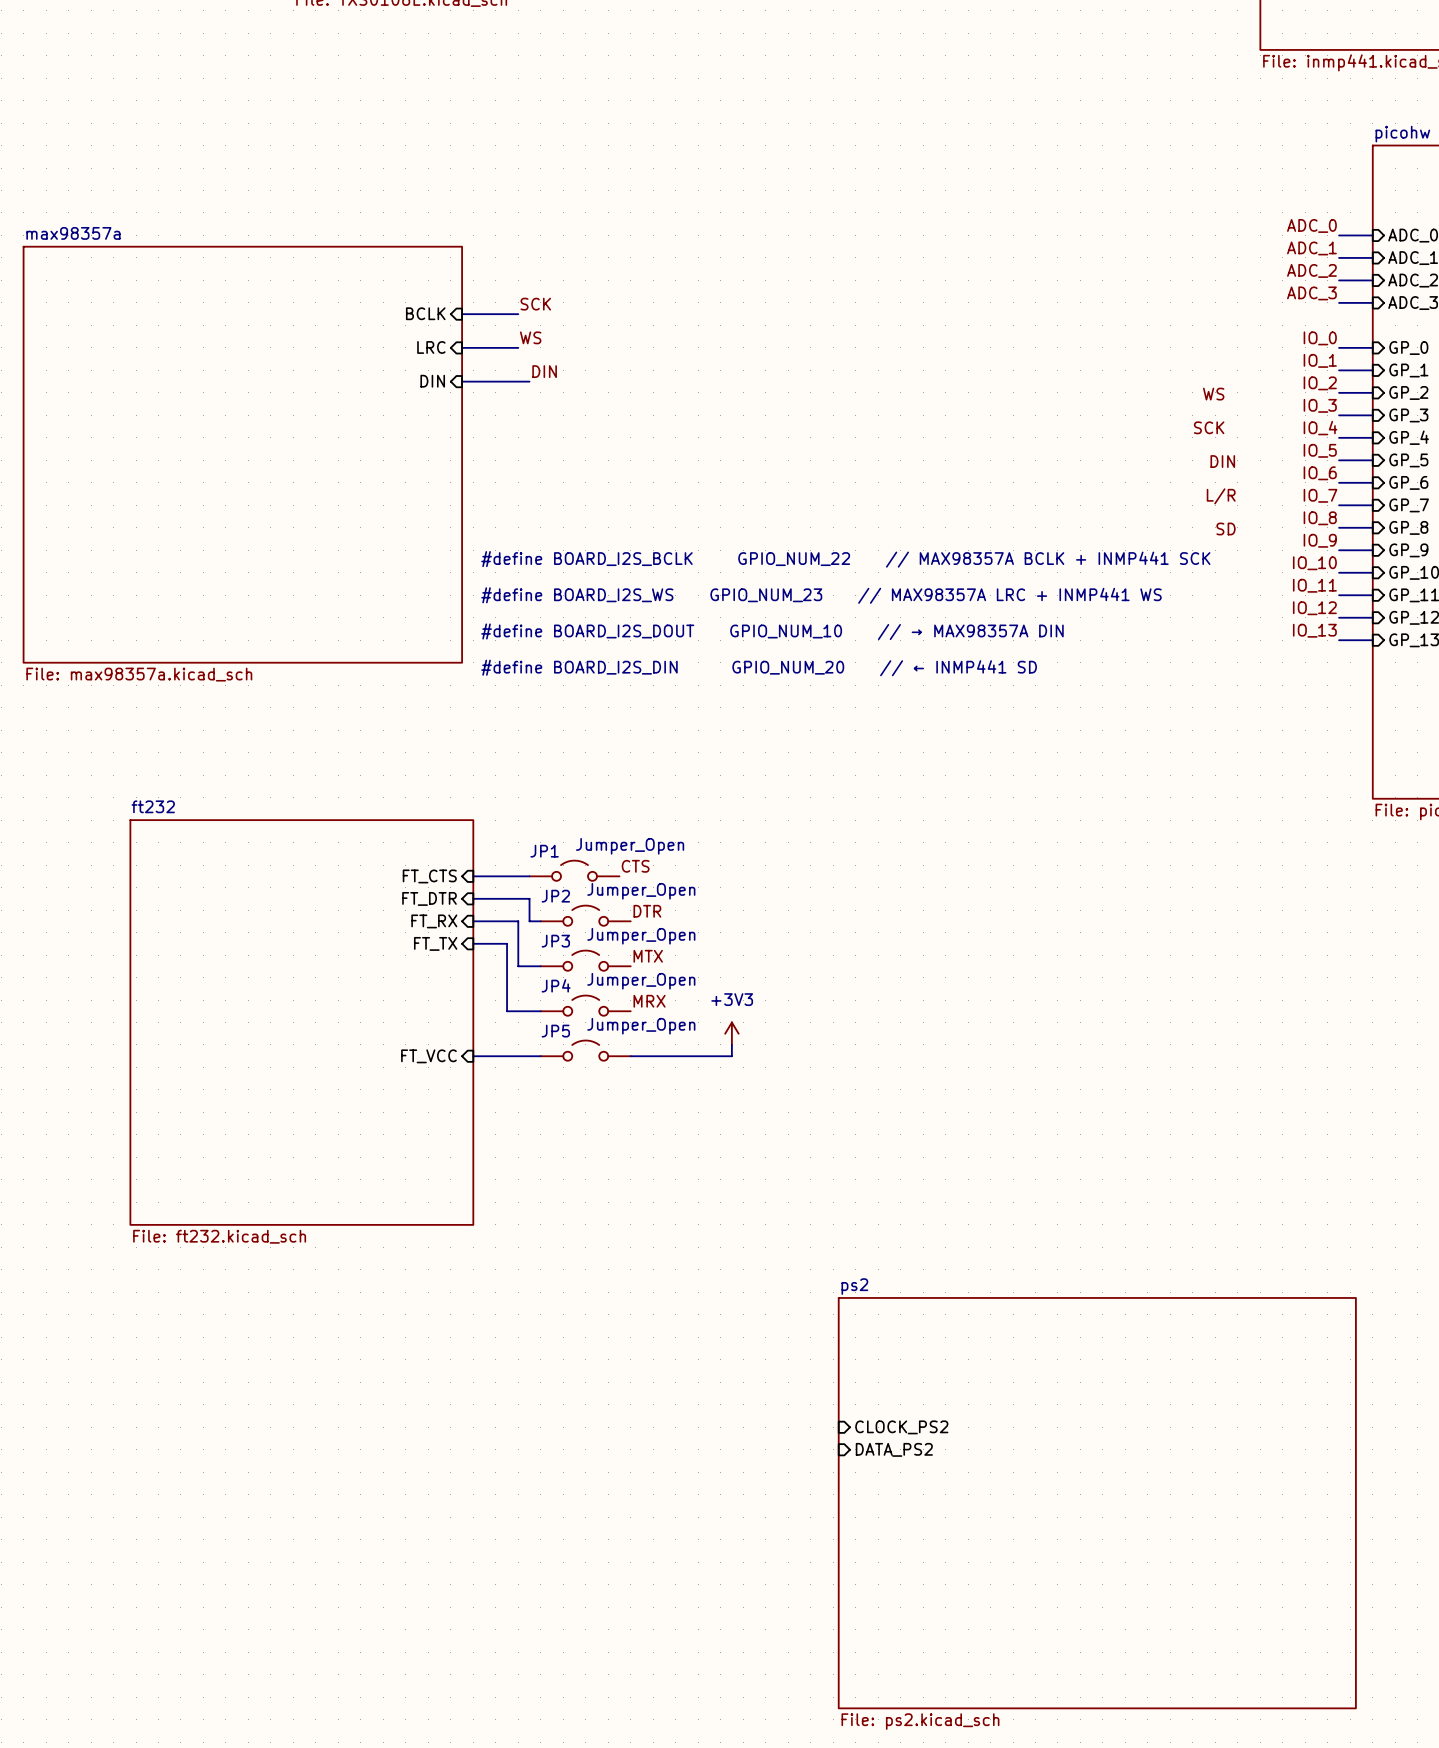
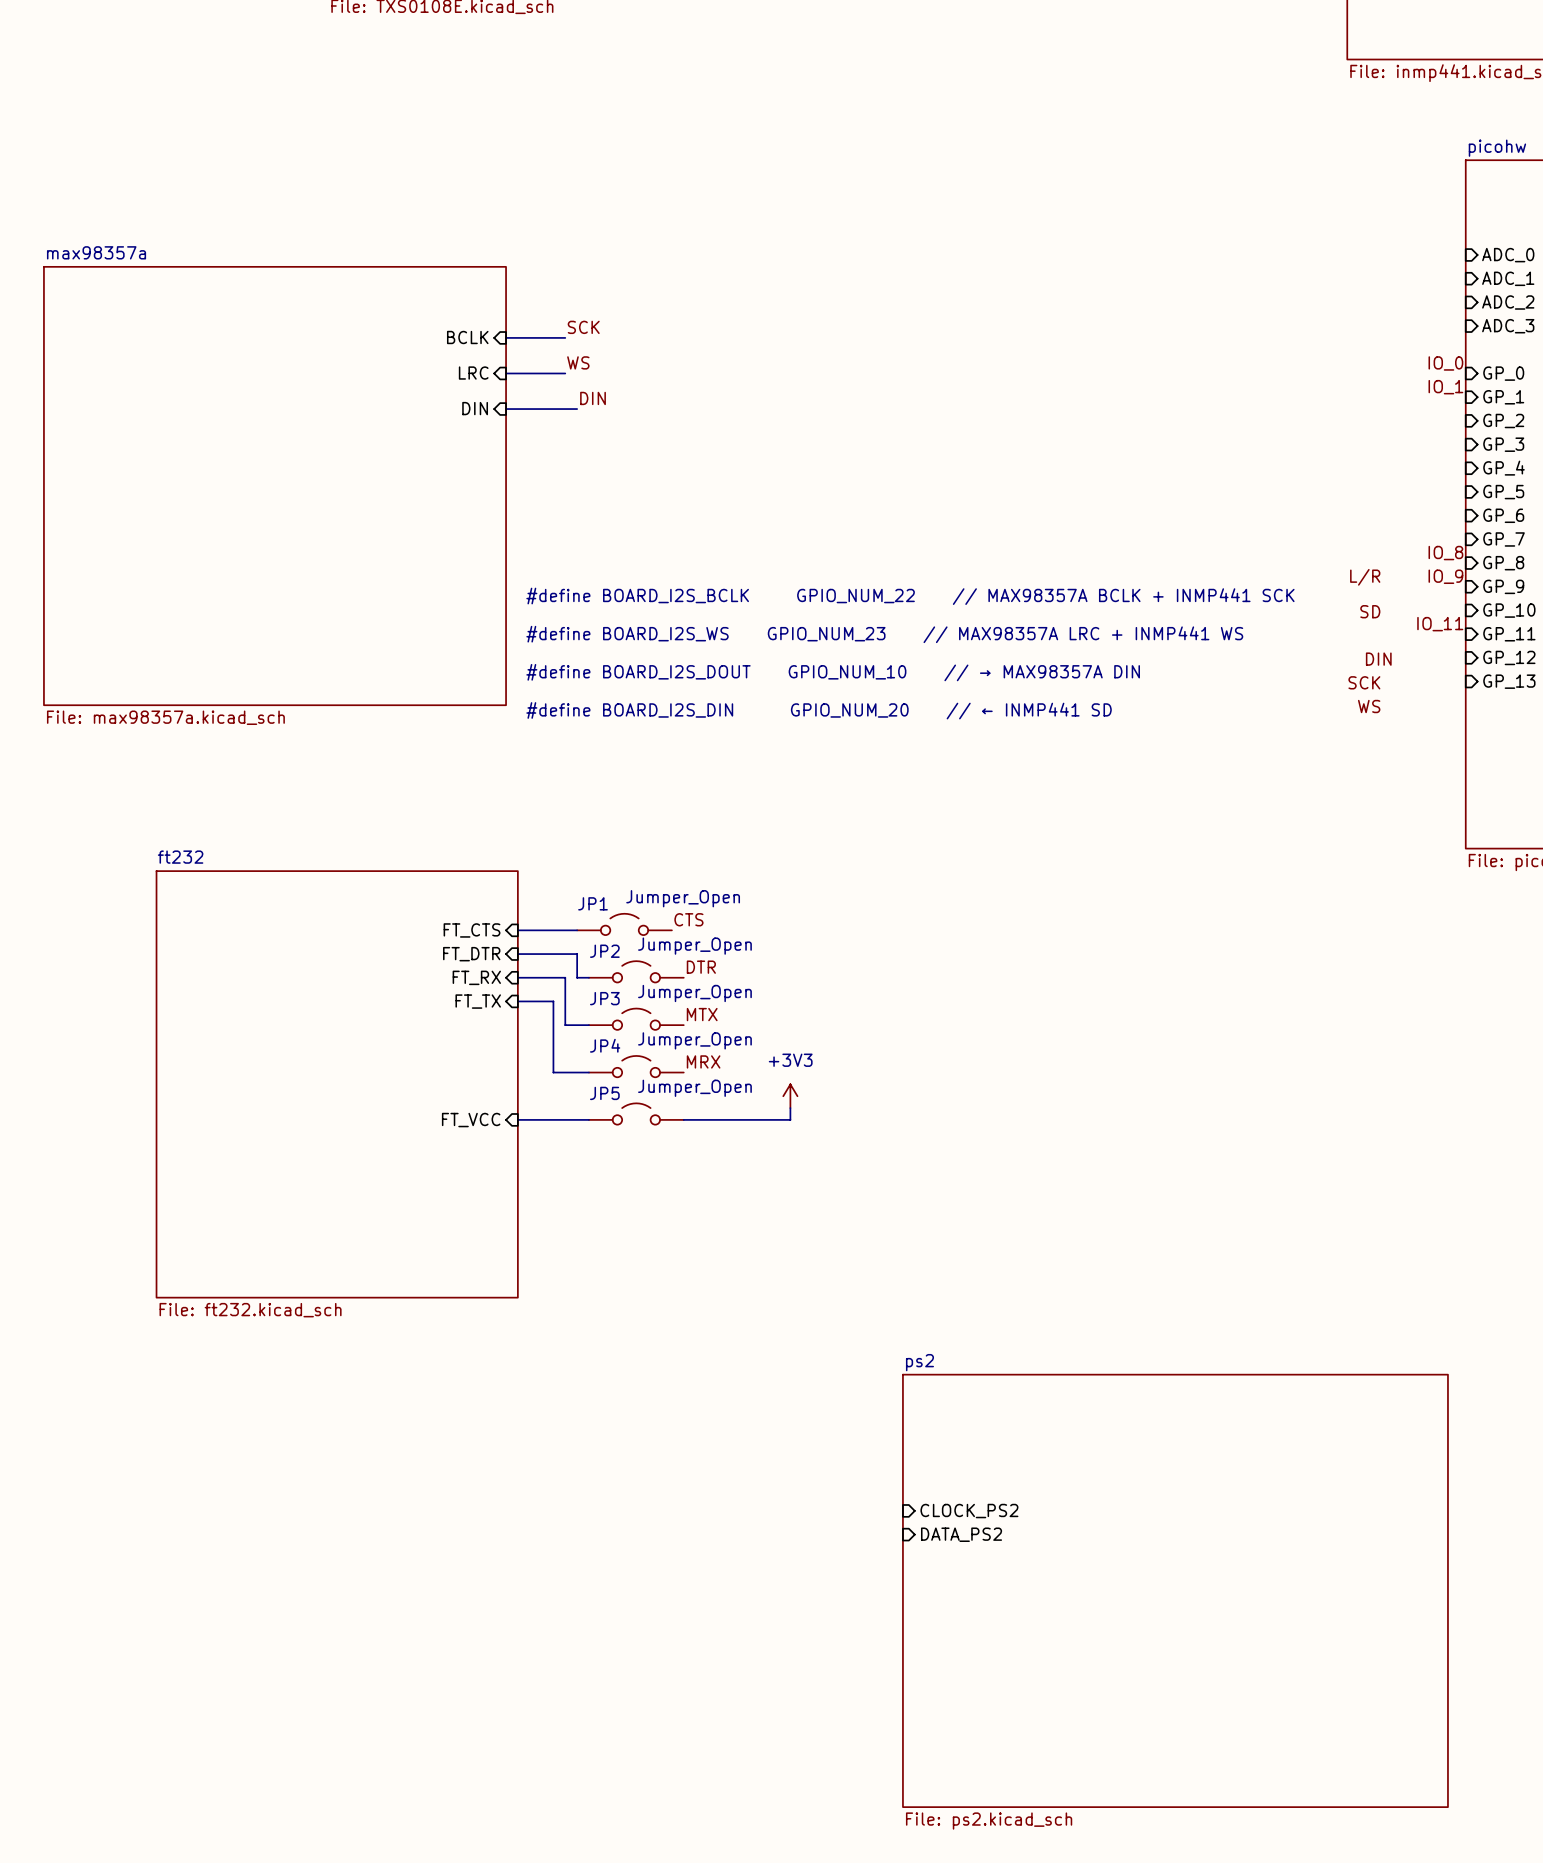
label: ADC_0 (1311, 225) -> none
wire: (1339, 235) (1372, 235) -> none
label: ADC_1 (1311, 248) -> none
wire: (1339, 257) (1372, 257) -> none
label: ADC_2 (1311, 270) -> none
wire: (1339, 280) (1372, 280) -> none
label: ADC_3 (1311, 293) -> none
wire: (1339, 302) (1372, 302) -> none
label position: IO_0 (1320, 338) -> IO_0 (1445, 363)
wire: (1339, 347) (1372, 347) -> none
label position: IO_1 (1320, 360) -> IO_1 (1445, 387)
wire: (1339, 370) (1372, 370) -> none
label: IO_2 (1320, 383) -> none
wire: (1339, 392) (1372, 392) -> none
label: WS (1213, 394) -> none
label: IO_3 (1320, 405) -> none
wire: (1339, 415) (1372, 415) -> none
label: SCK (1209, 427) -> none
label: IO_4 (1320, 428) -> none
wire: (1339, 437) (1372, 437) -> none
label: IO_5 (1320, 450) -> none
wire: (1339, 460) (1372, 460) -> none
label position: DIN (1222, 461) -> DIN (1378, 659)
label: IO_6 (1320, 473) -> none
wire: (1339, 482) (1372, 482) -> none
label: IO_7 (1320, 495) -> none
label position: L/R (1221, 496) -> L/R (1365, 577)
wire: (1339, 505) (1372, 505) -> none
label position: IO_8 (1320, 518) -> IO_8 (1445, 553)
wire: (1339, 527) (1372, 527) -> none
label position: SD (1226, 529) -> SD (1370, 611)
label position: IO_9 (1320, 540) -> IO_9 (1445, 576)
wire: (1339, 550) (1372, 550) -> none
label: IO_10 (1314, 563) -> none
wire: (1339, 572) (1372, 572) -> none
label position: IO_11 (1314, 585) -> IO_11 (1440, 624)
wire: (1339, 595) (1372, 595) -> none
label: IO_12 (1314, 608) -> none
wire: (1339, 617) (1372, 617) -> none
label: IO_13 (1314, 630) -> none
wire: (1339, 640) (1372, 640) -> none
label: none -> SCK (1364, 682)
label: none -> WS (1369, 706)

